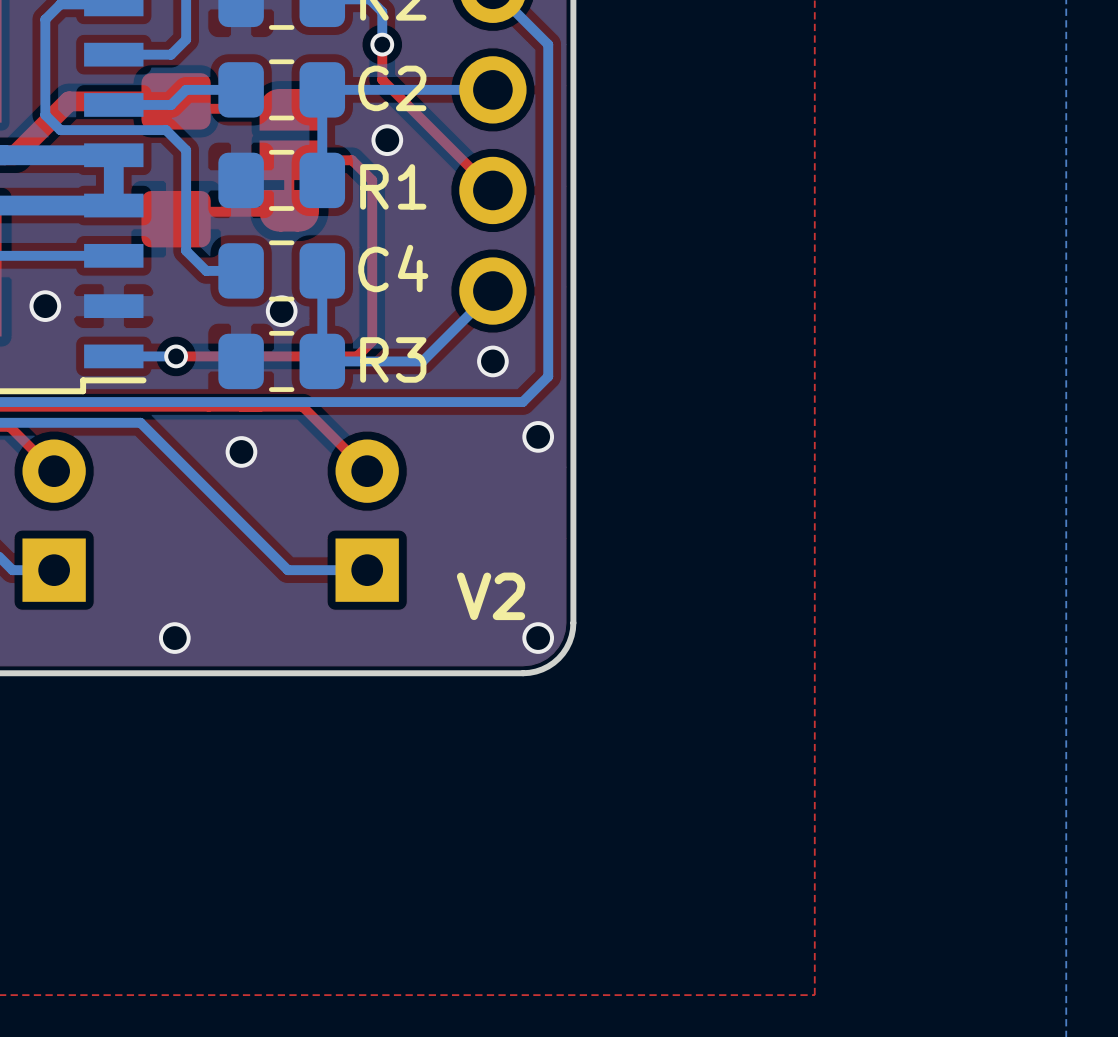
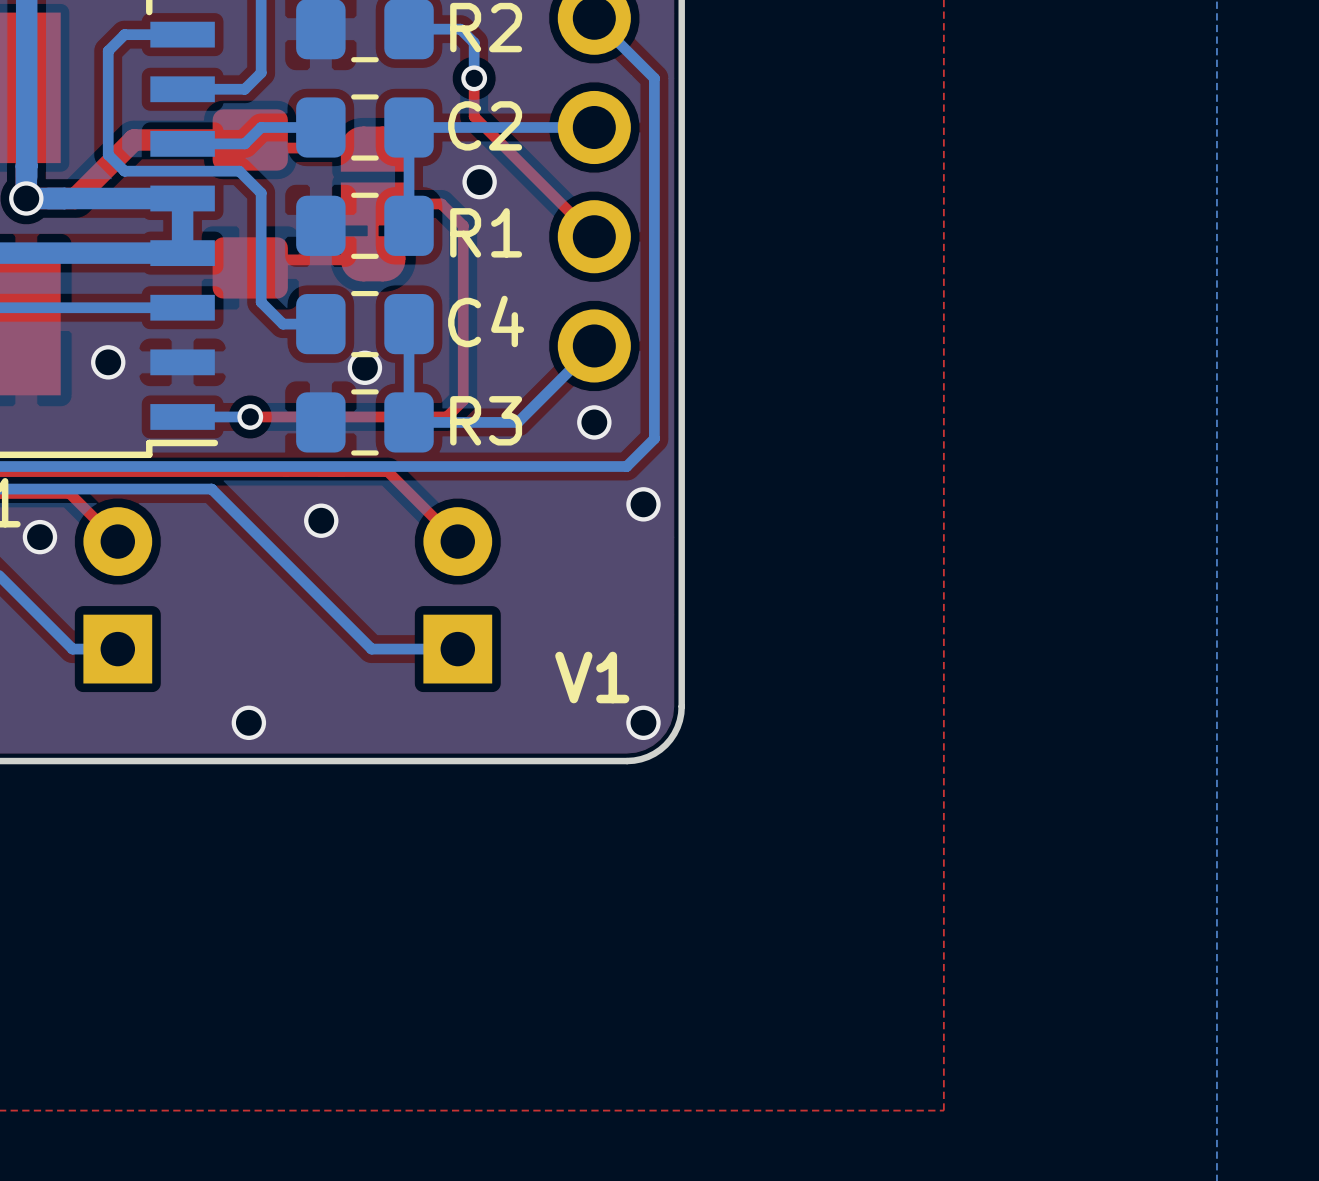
text: V2 (491, 596) -> V1 (592, 677)

